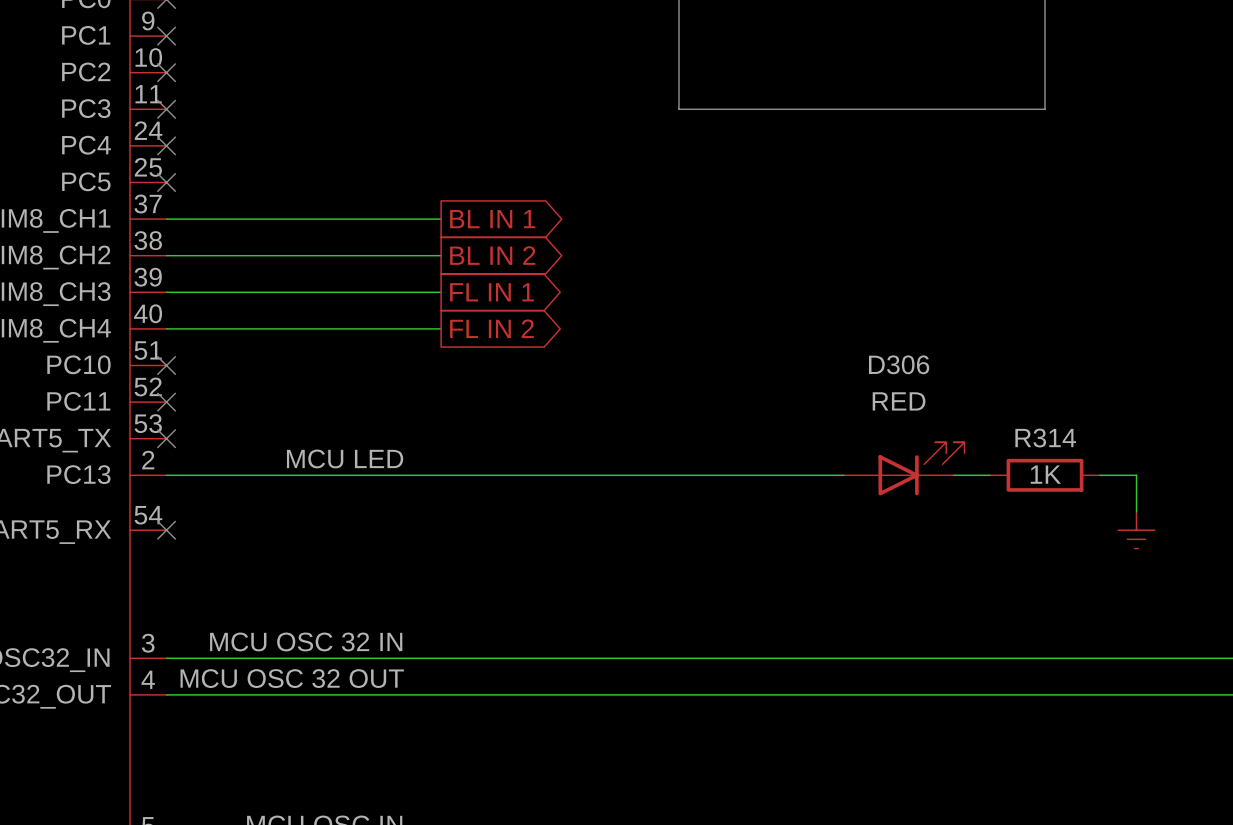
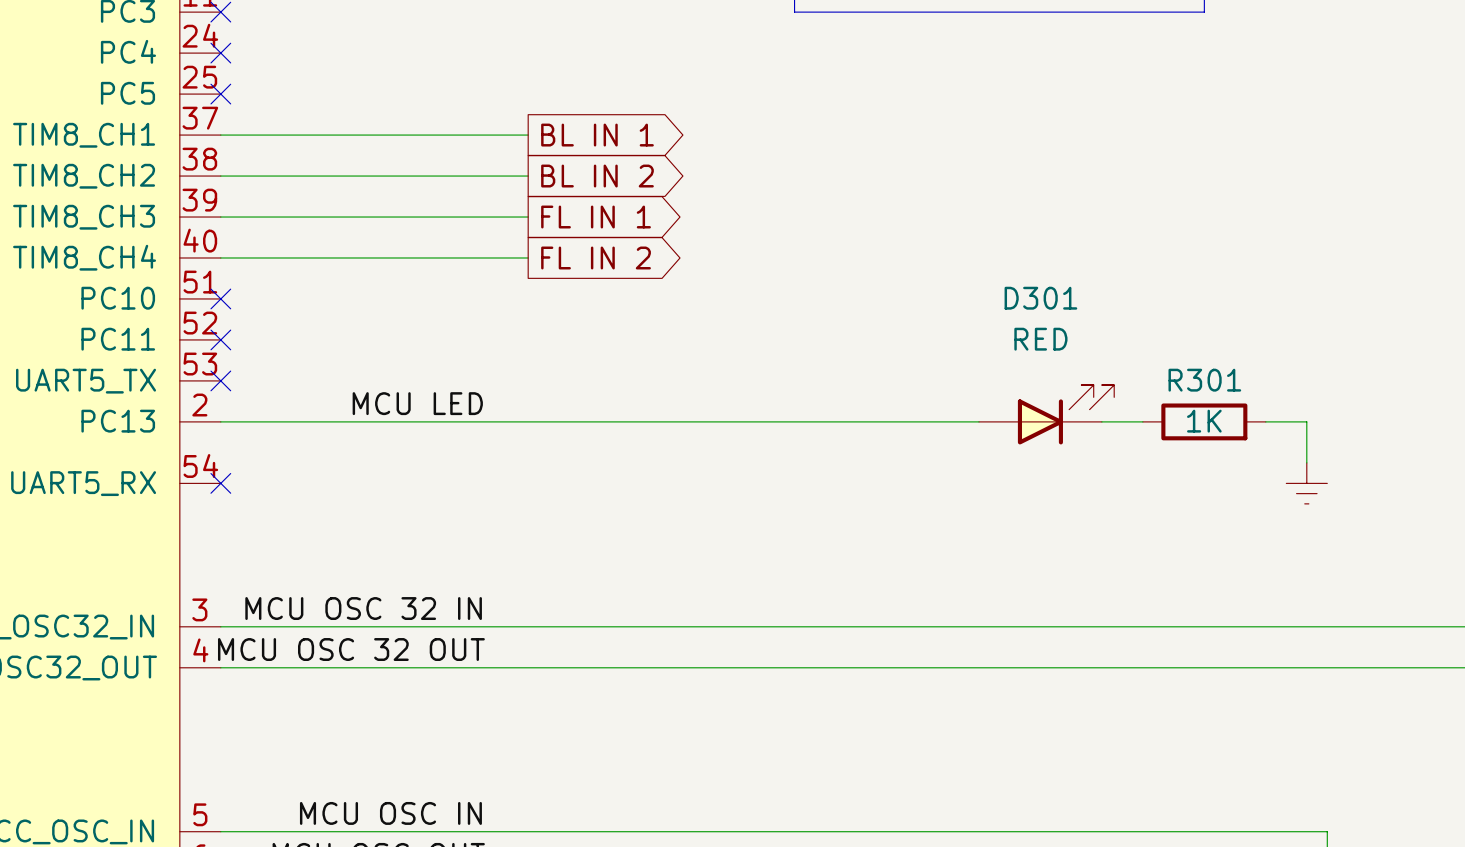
D306 name: D306 (899, 364) -> D301 (1040, 298)
R314 name: R314 (1045, 438) -> R301 (1204, 380)

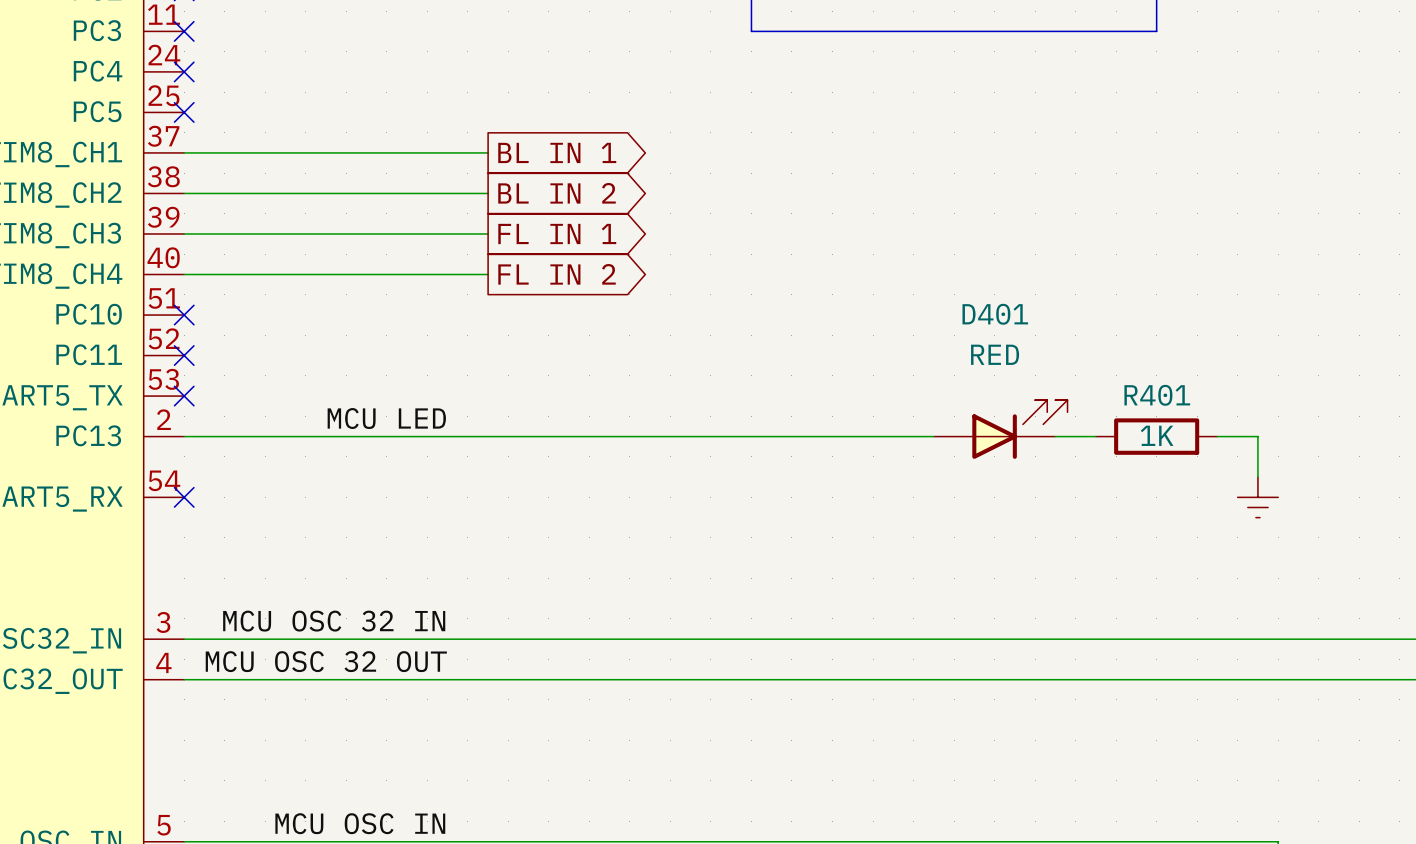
D301 name: D301 (1040, 298) -> D401 (995, 314)
R301 name: R301 (1204, 380) -> R401 (1157, 395)

